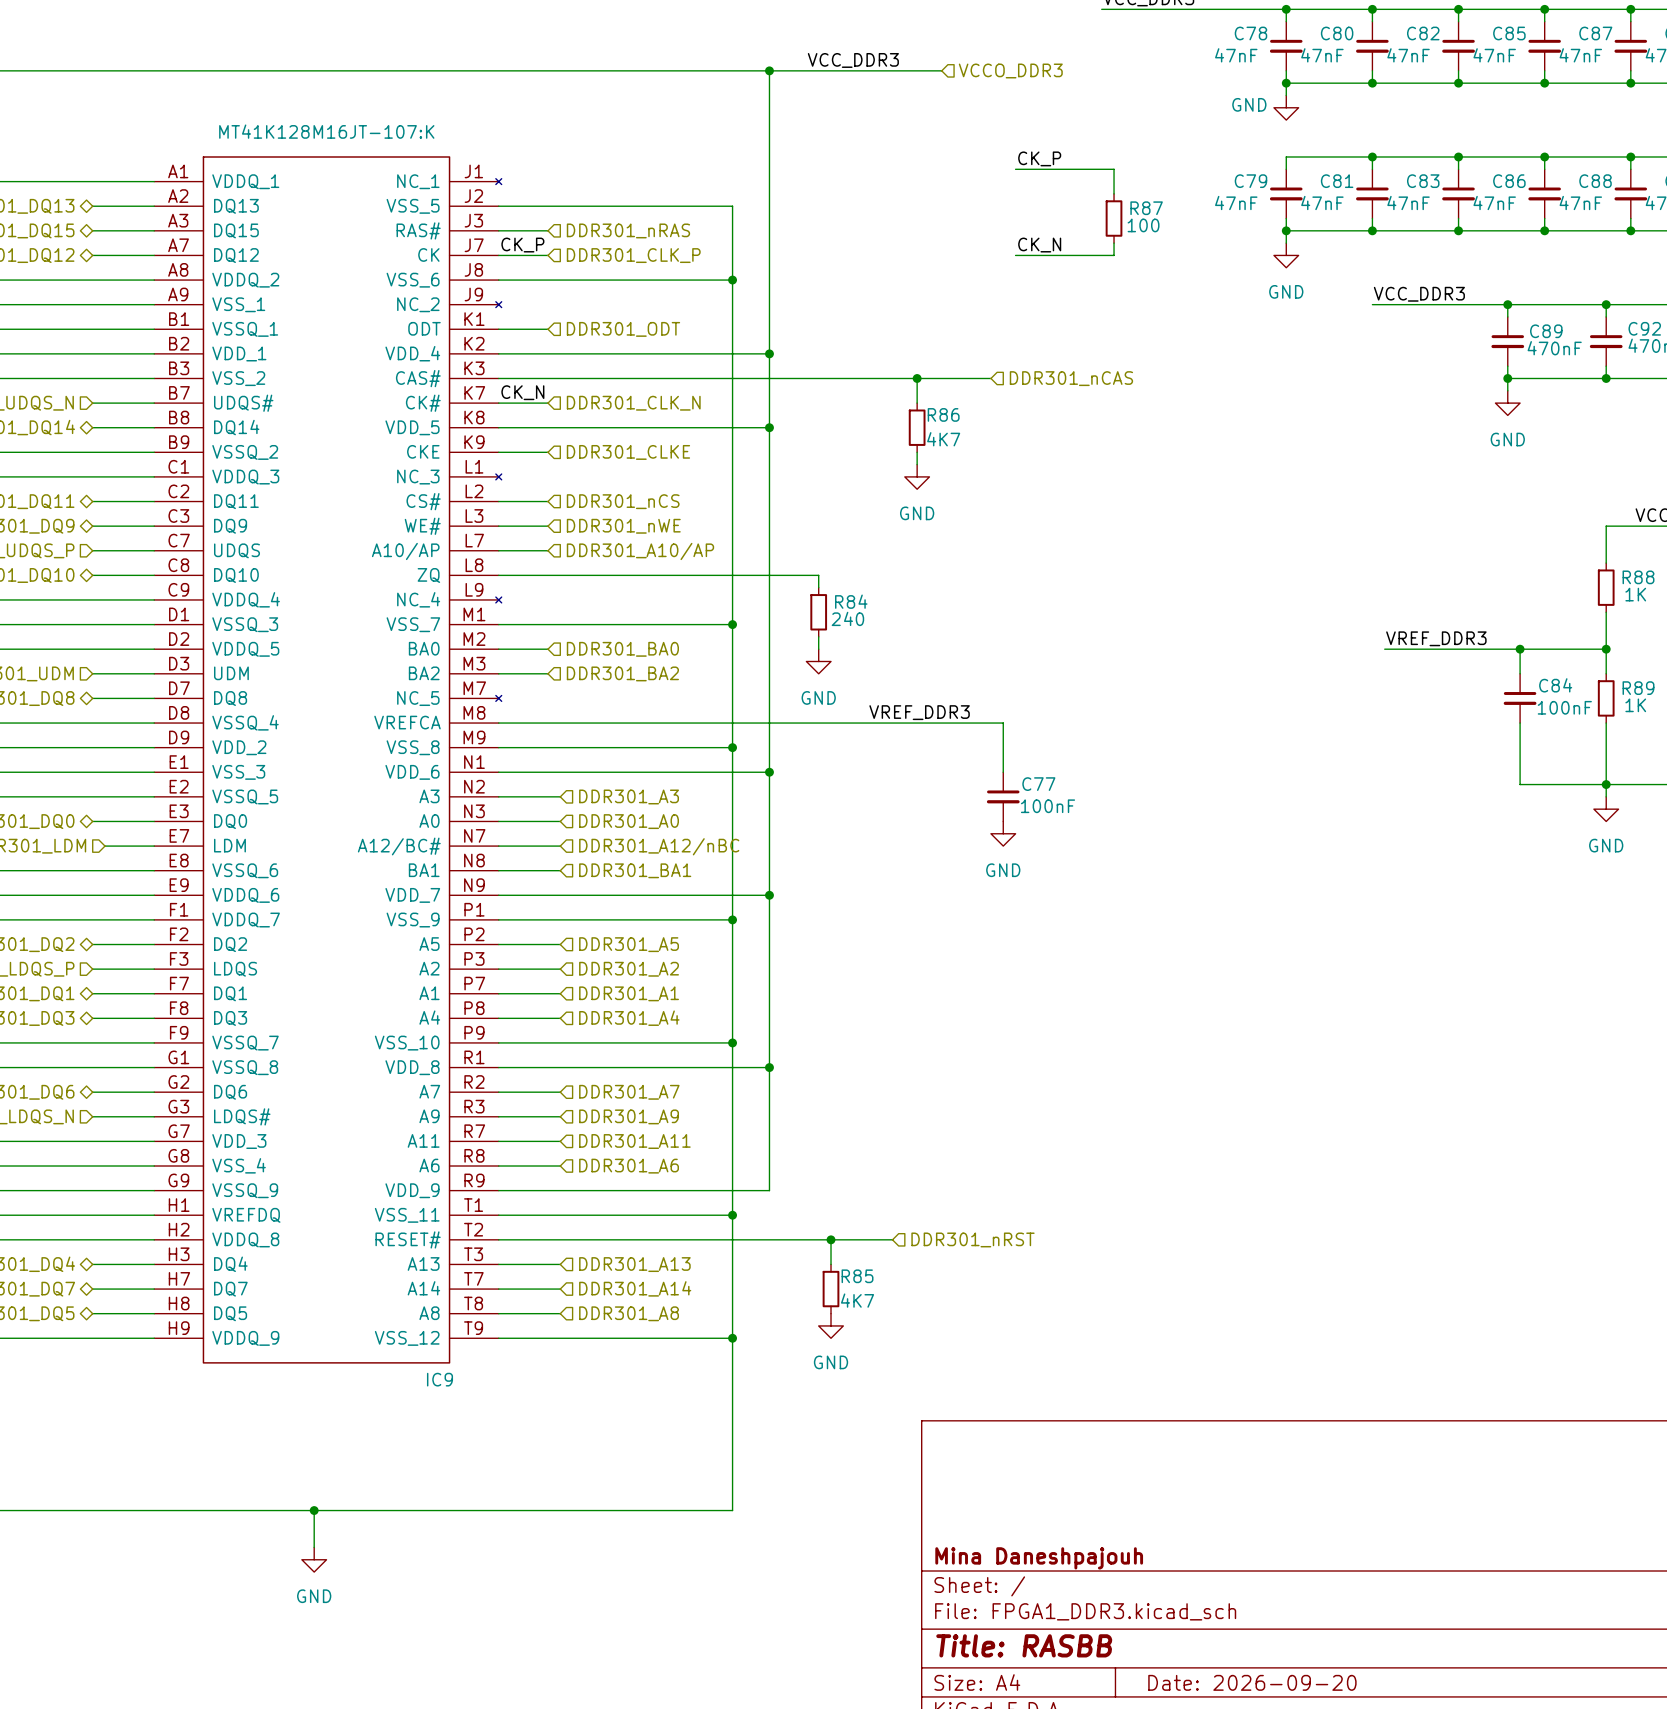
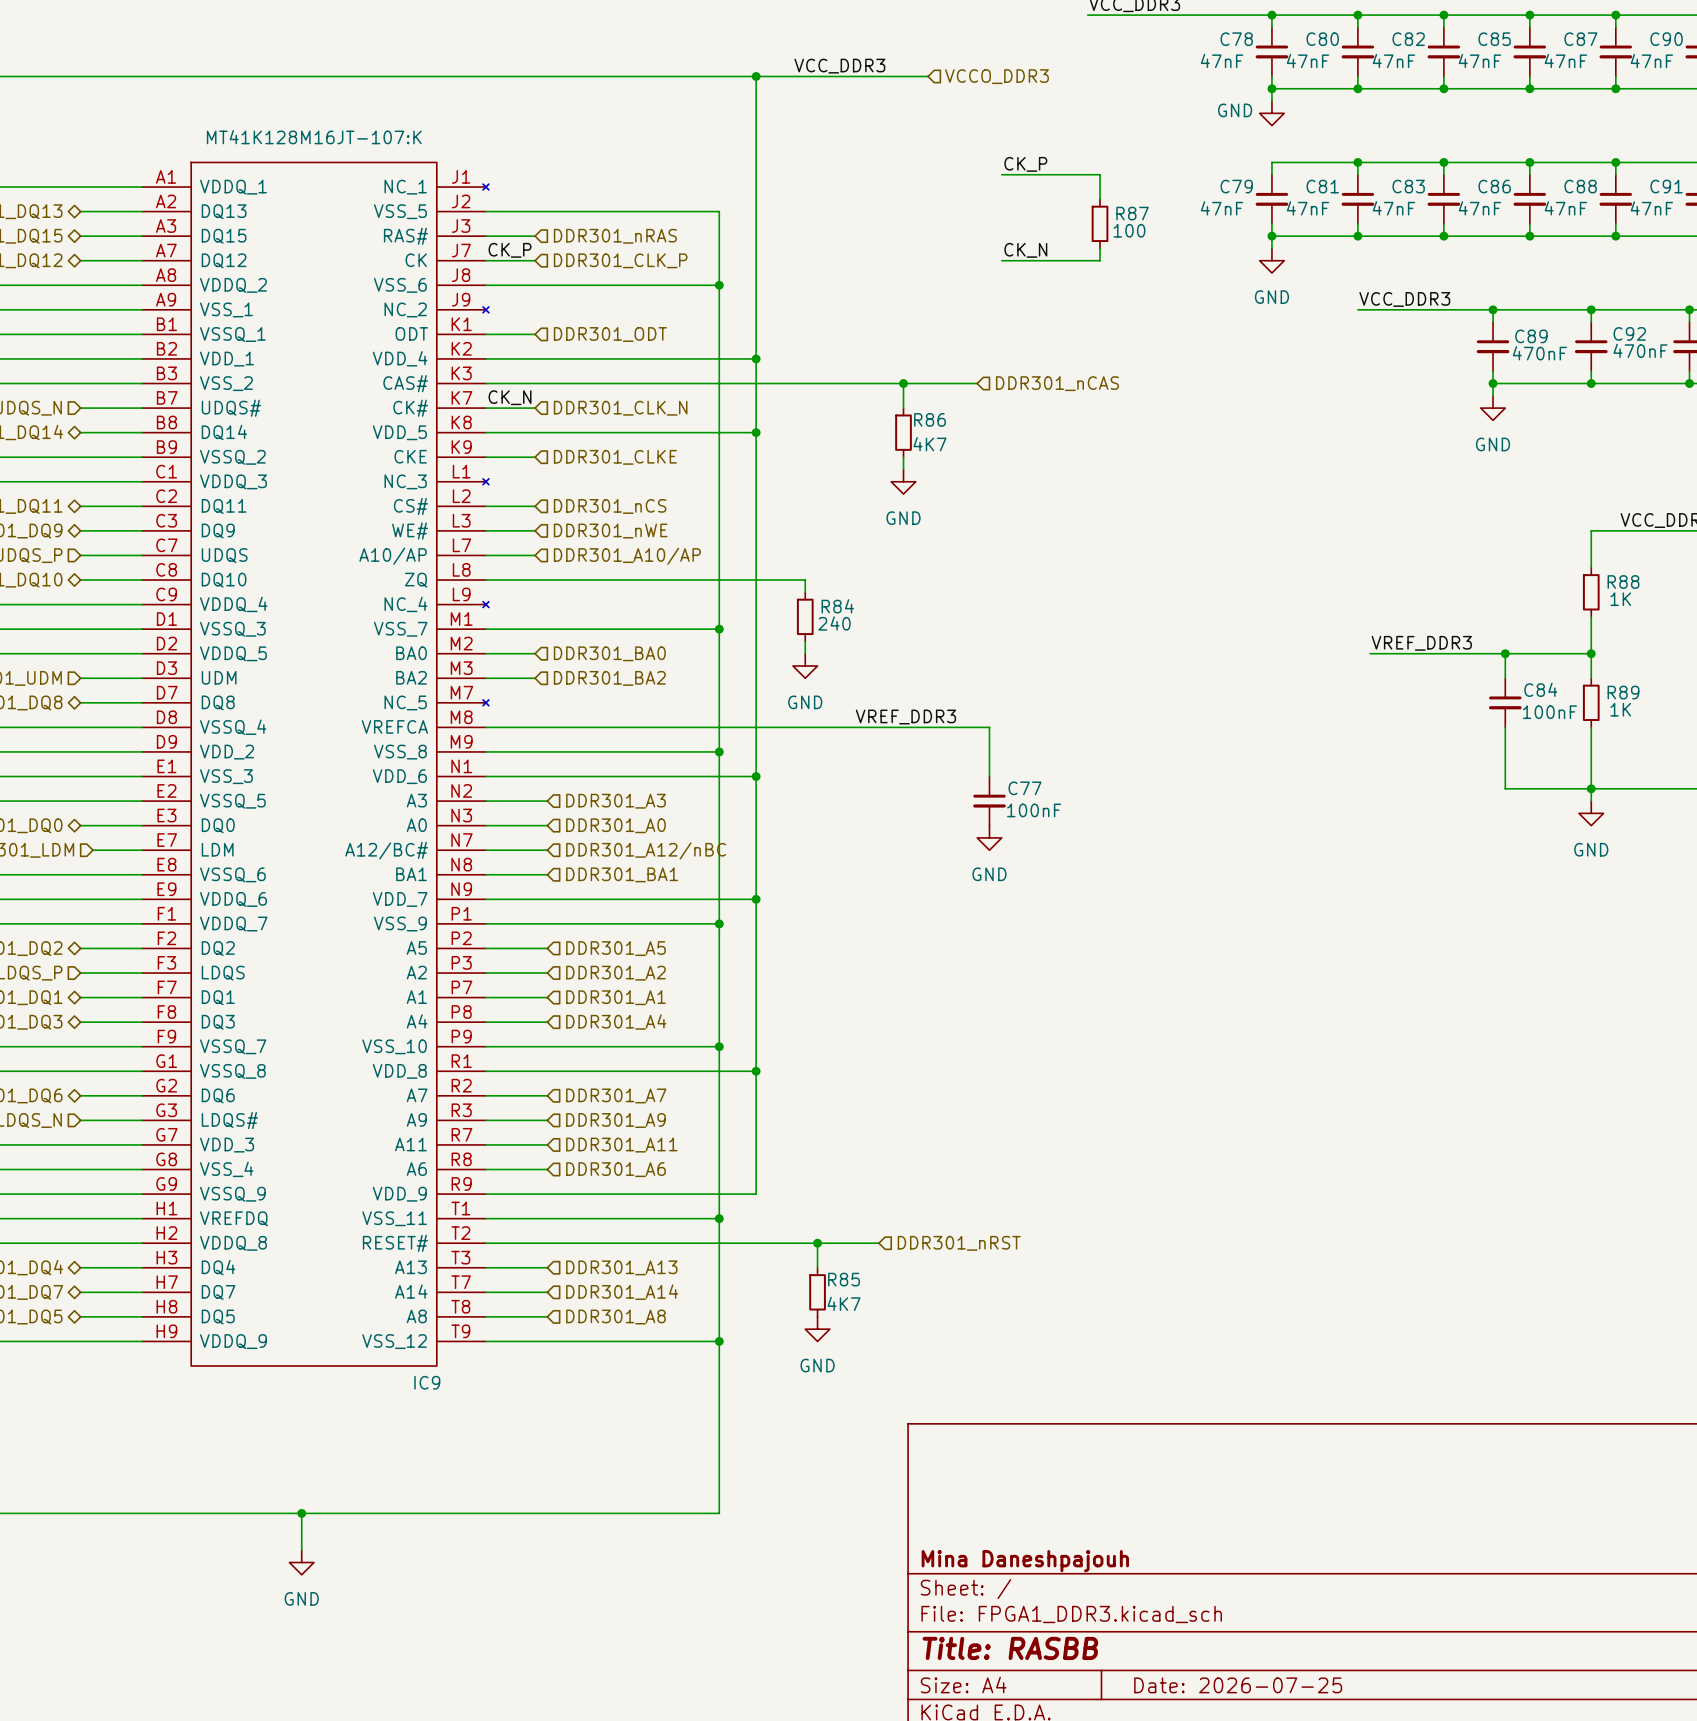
title block: Date: 2026-09-20 (1252, 1682) -> Date: 2026-07-25 (1238, 1685)

